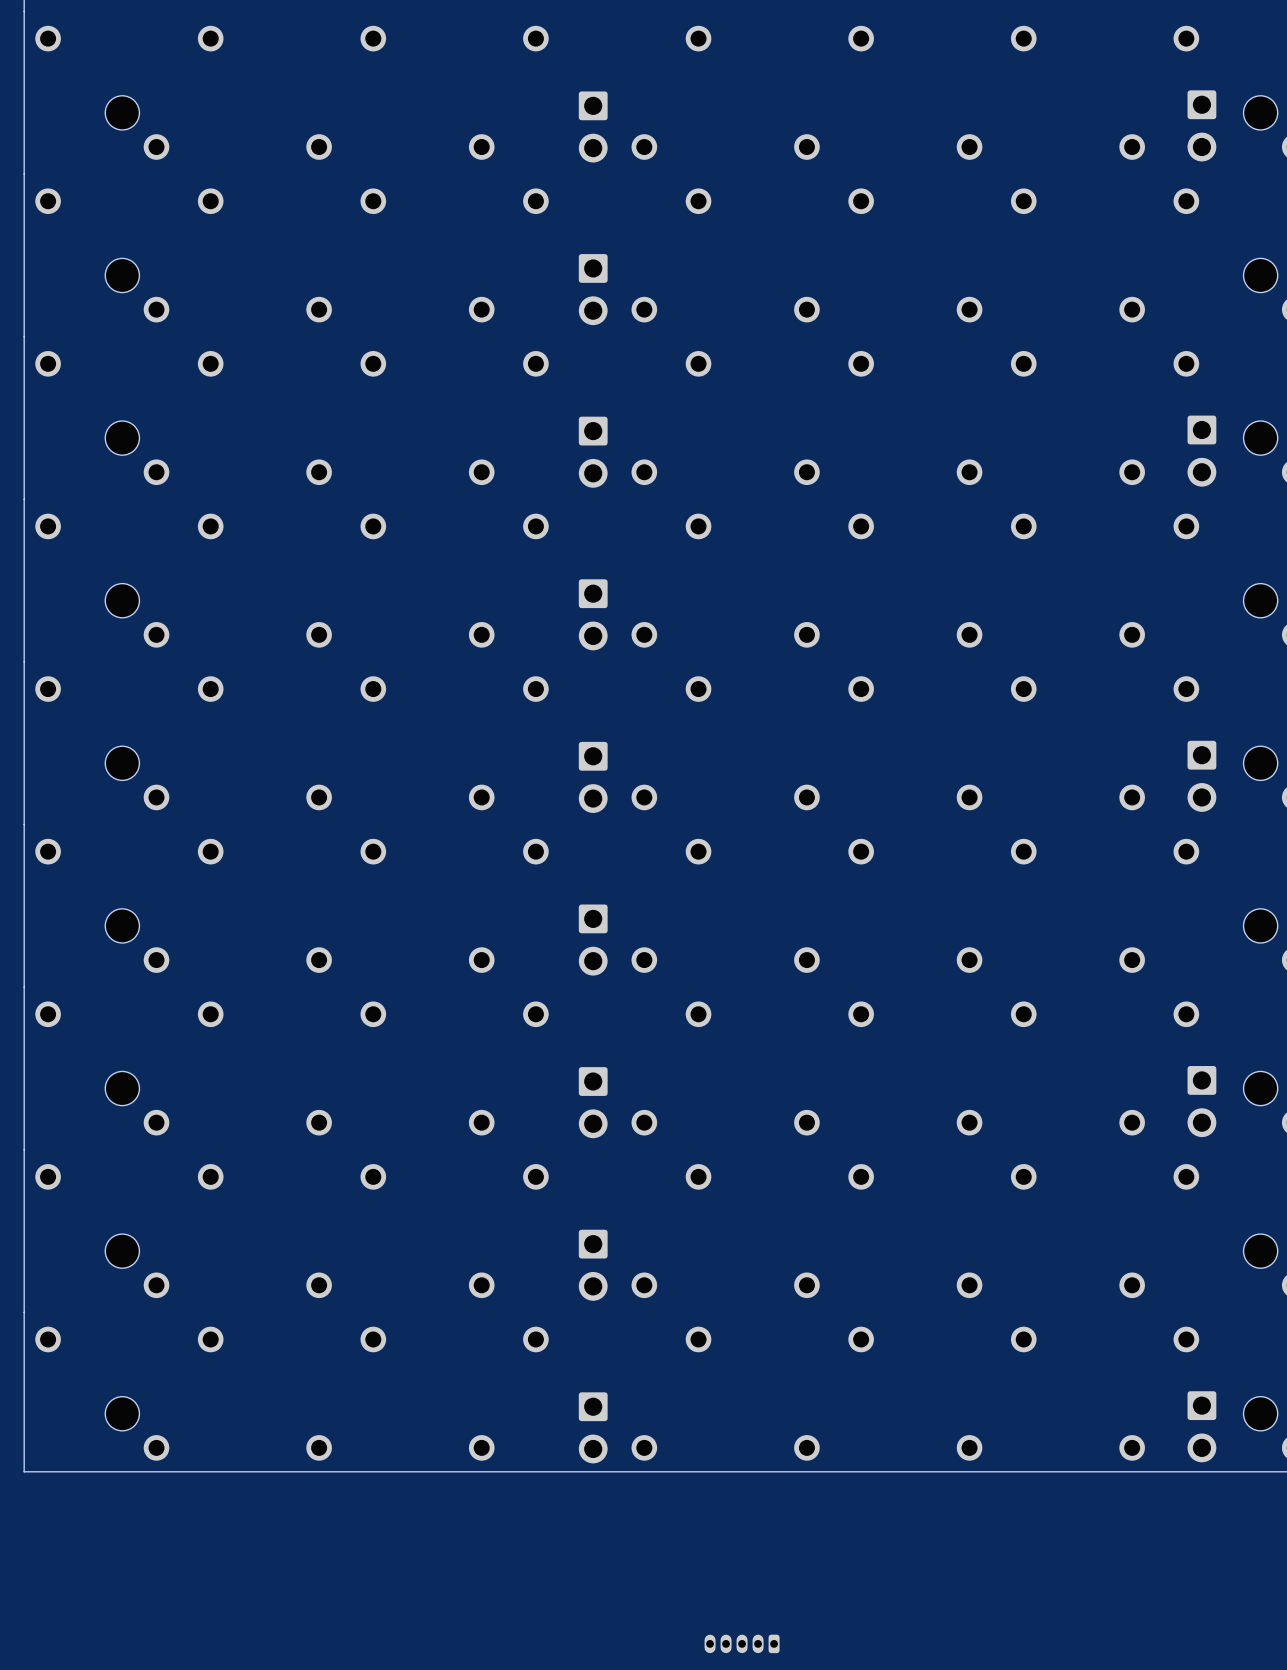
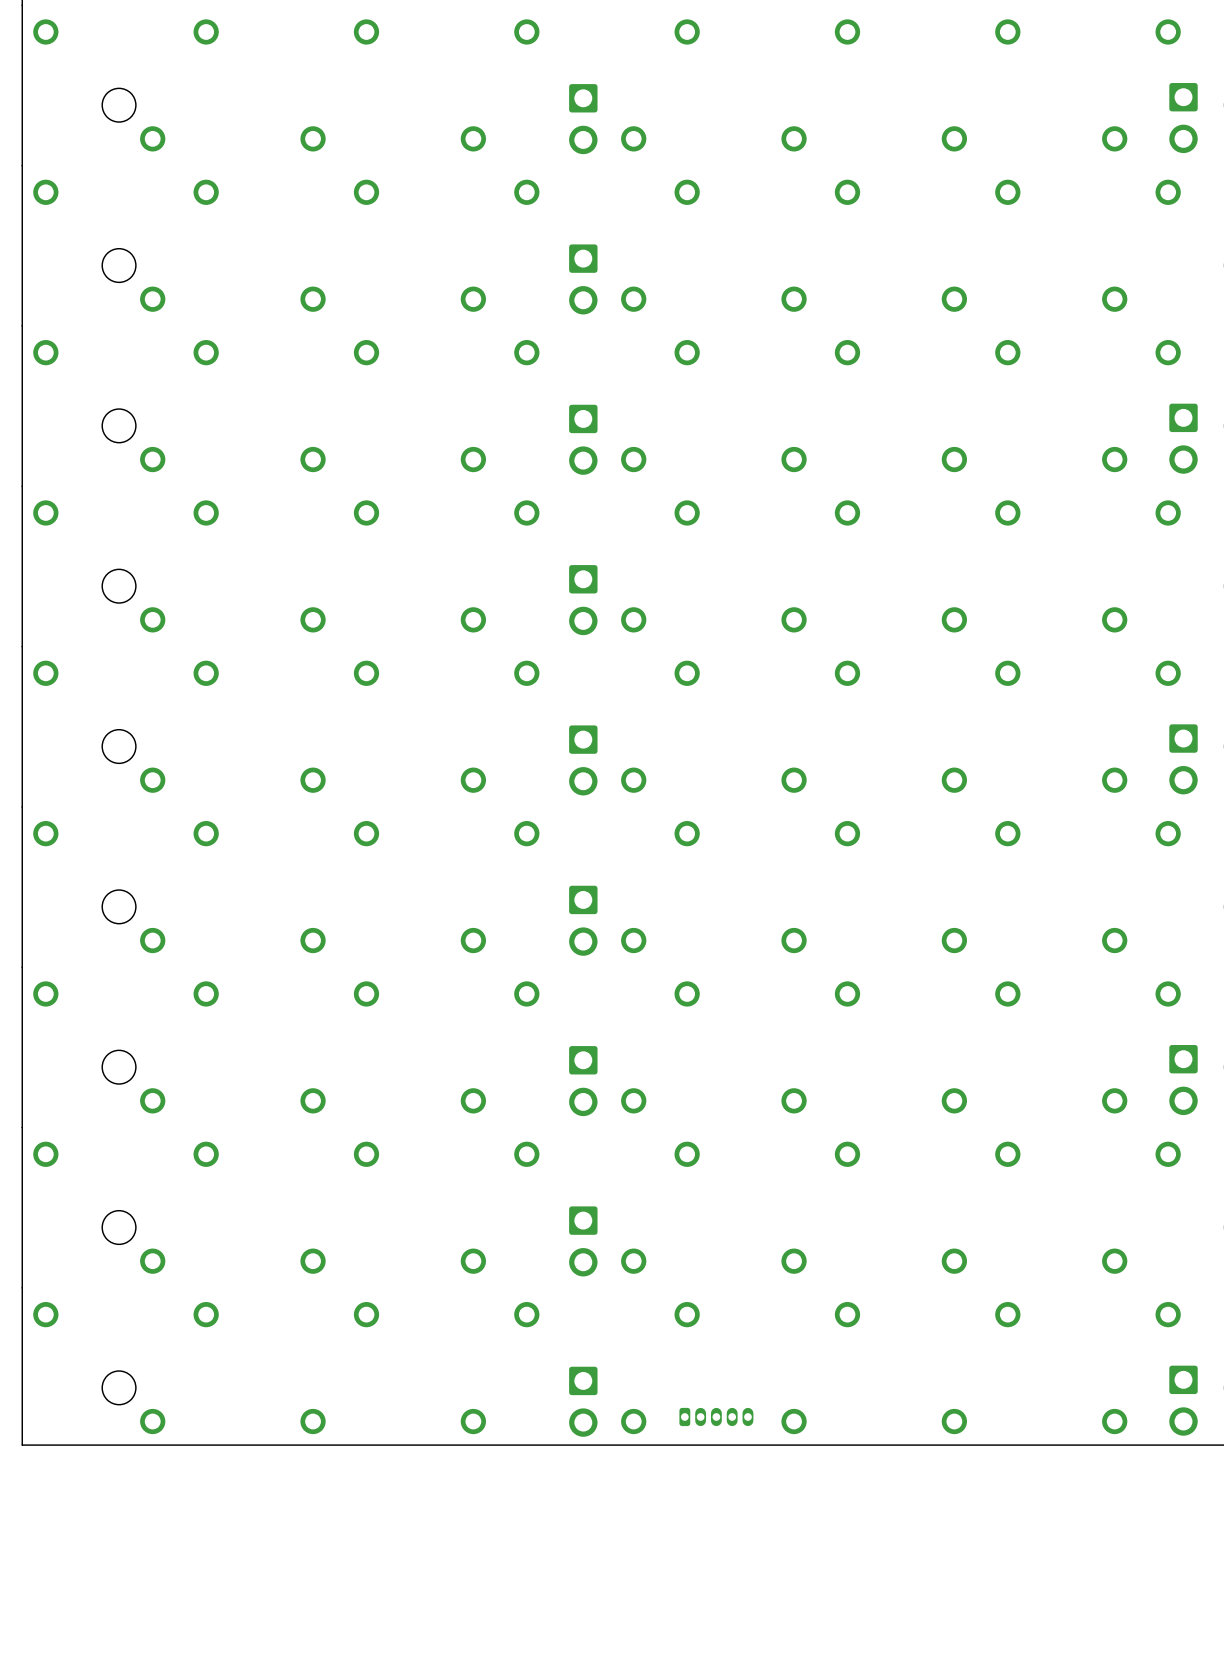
part rotation: 0° (742, 1643) -> 180° (716, 1416)
part position: (742, 1643) -> (716, 1416)

